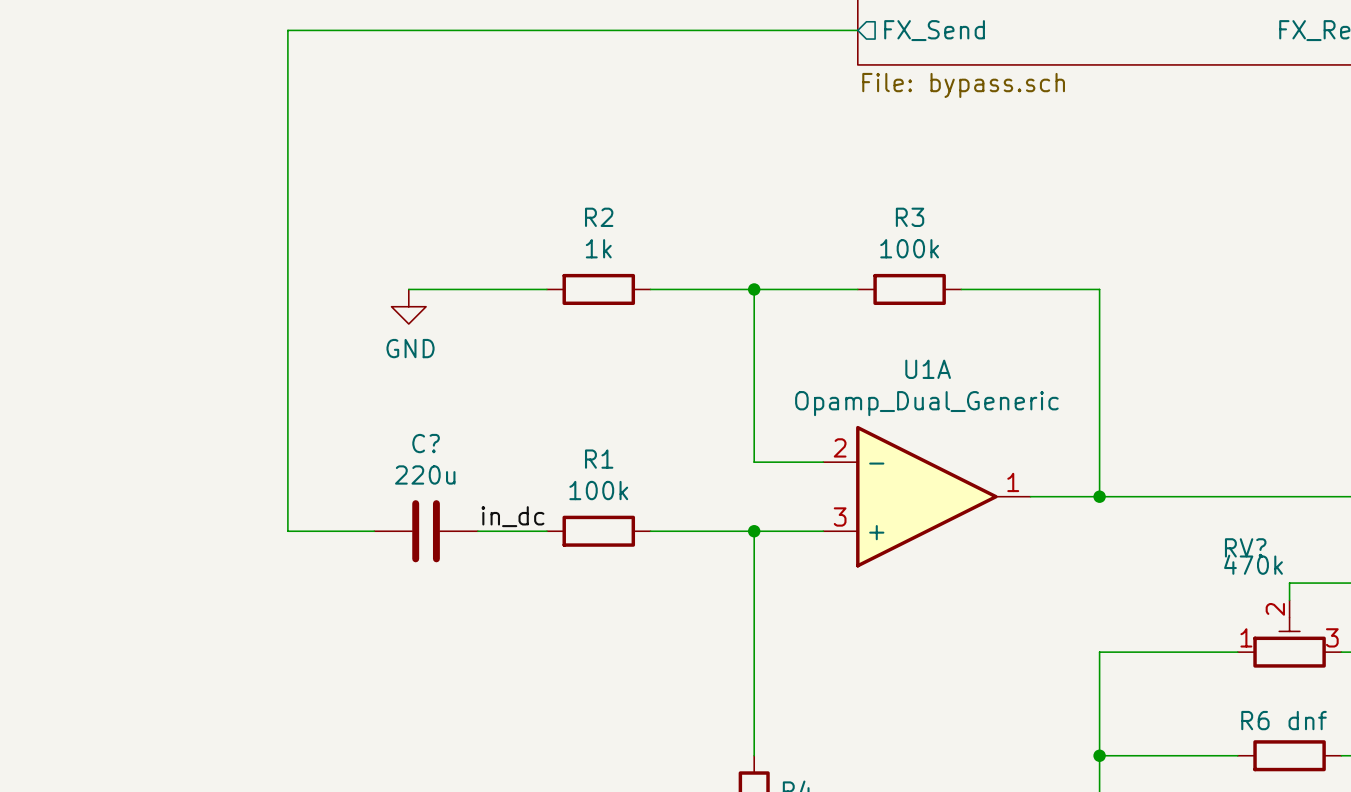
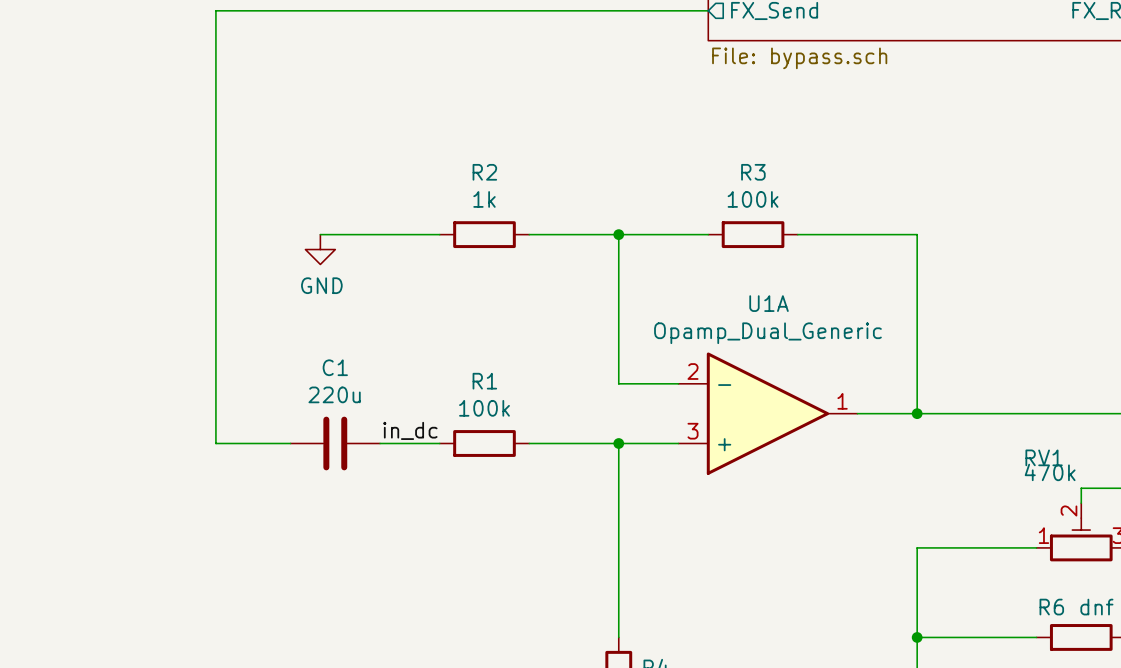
C? name: C? (426, 443) -> C1 (335, 367)
RV? name: RV? (1245, 547) -> RV1 (1044, 457)

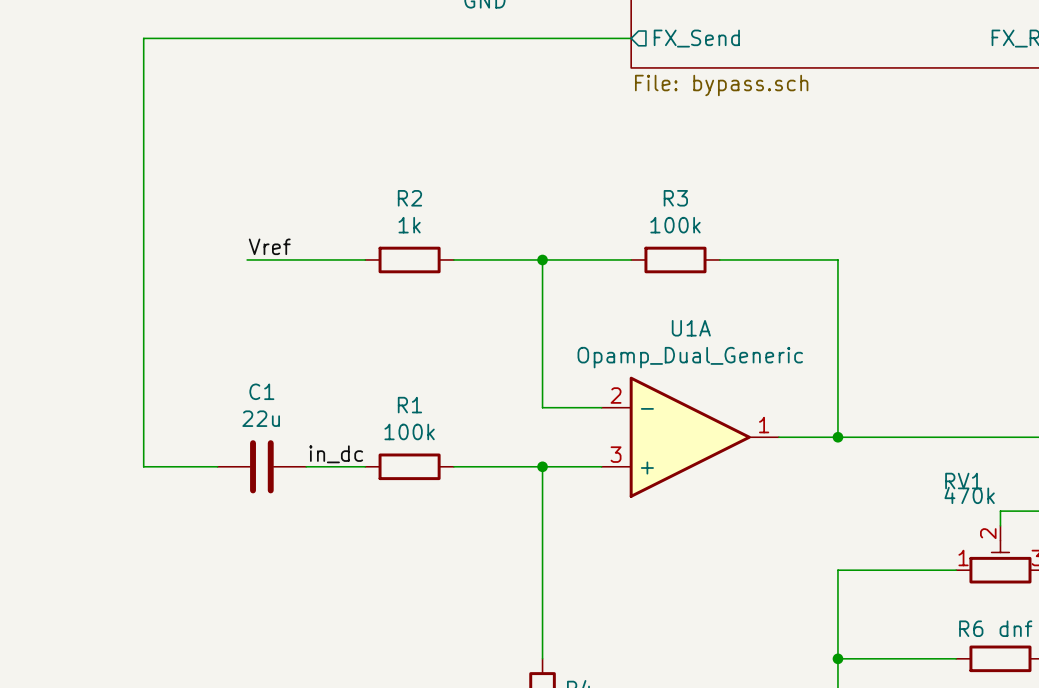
label: none -> Vref (269, 246)
power symbol: GND (320, 249) -> none
C1 value: 220u (334, 394) -> 22u (261, 418)

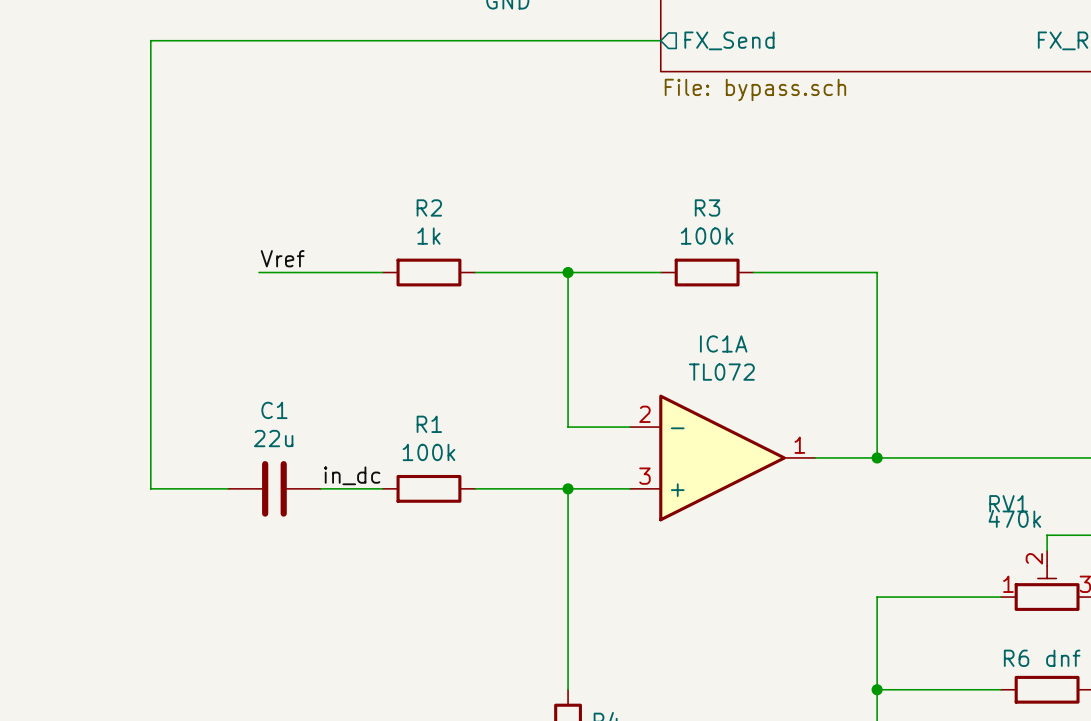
U1A name: U1A (691, 328) -> IC1A (723, 343)
U1A value: Opamp_Dual_Generic (690, 357) -> TL072 (721, 372)

